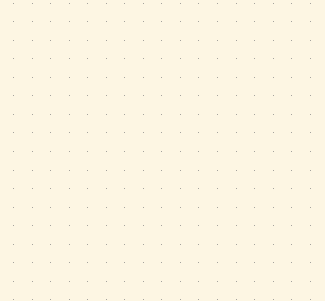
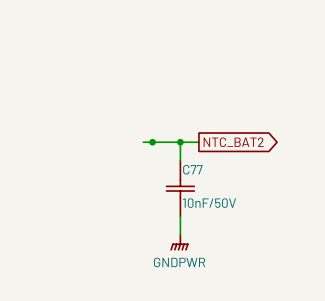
wire: none -> (143, 142) (198, 142)
junction: none -> (152, 142)
wire: none -> (180, 142) (180, 160)
junction: none -> (180, 142)
global label: none -> NTC_BAT2 (233, 142)
C77: none -> 10nF/50V (180, 188)
wire: none -> (180, 216) (180, 234)
power symbol: none -> GNDPWR (179, 242)

